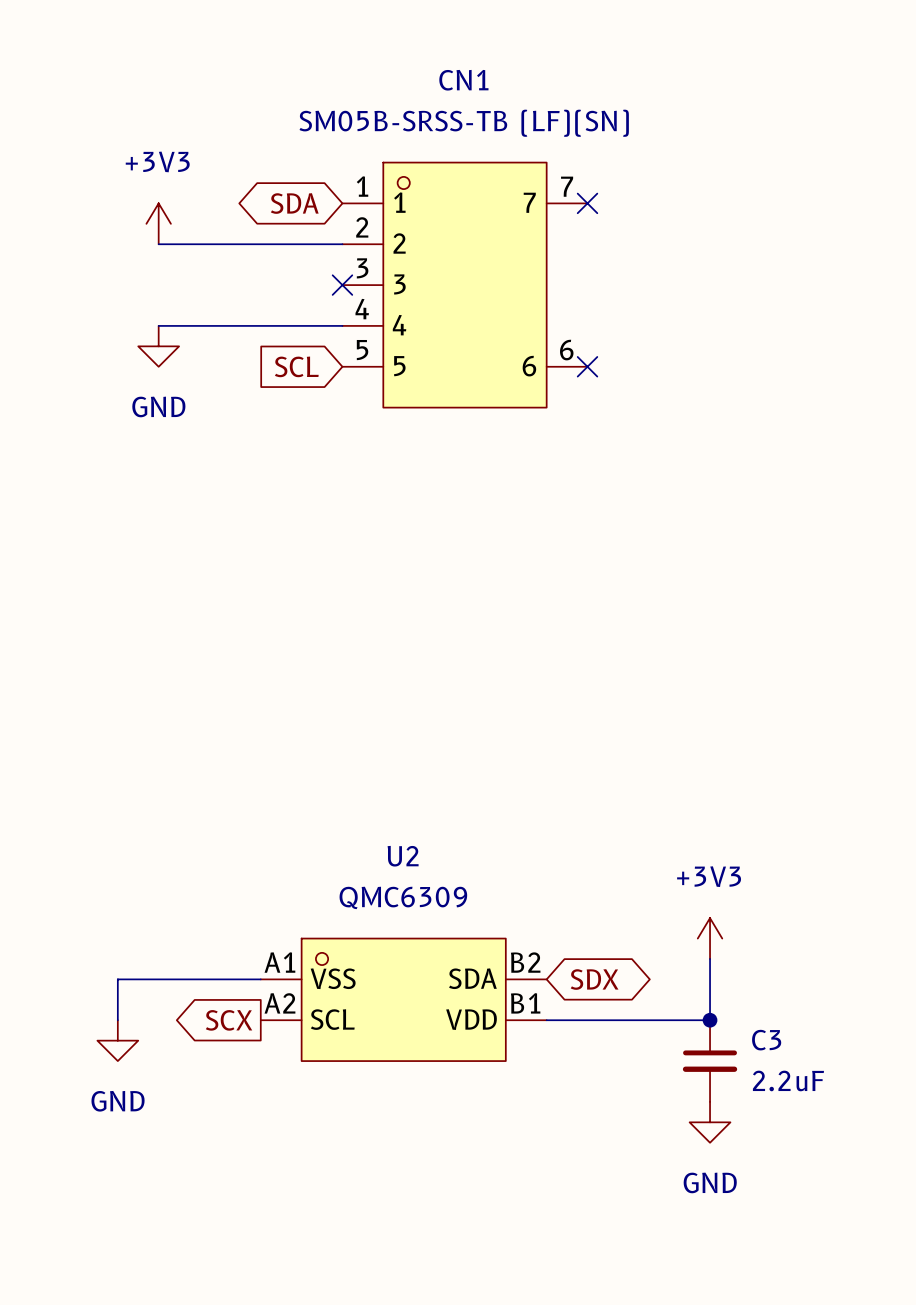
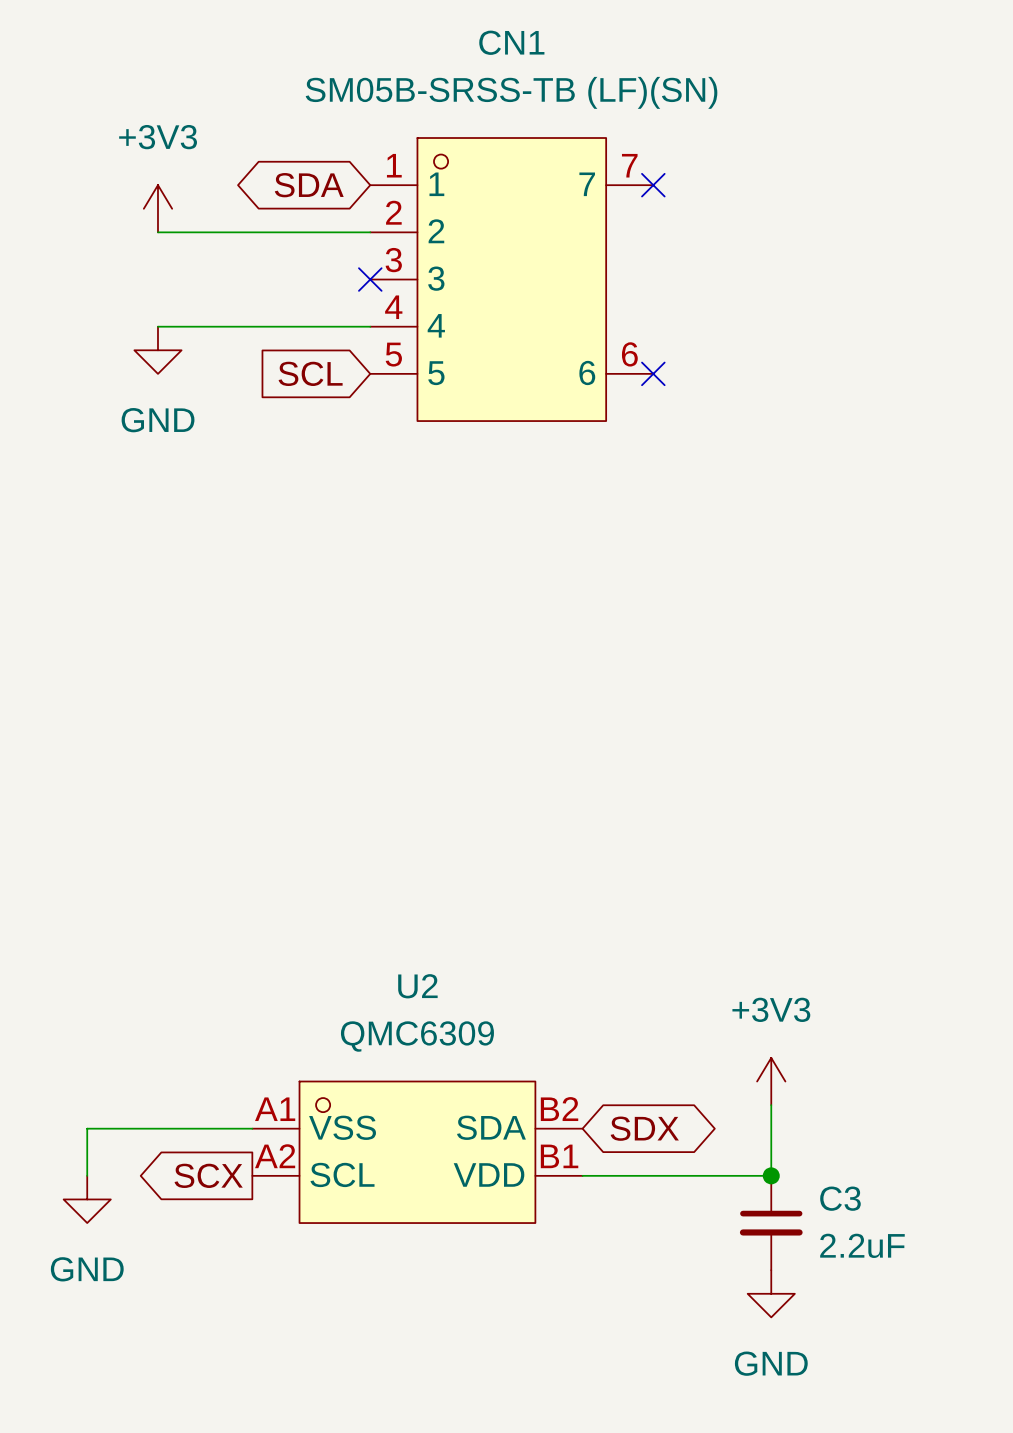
power symbol position: +3V3 (710, 938) -> +3V3 (771, 1081)
wire: (710, 958) (710, 1020) (546, 1020) -> (771, 1105) (771, 1175) (582, 1175)
wire: (260, 979) (117, 979) (117, 1020) -> (252, 1128) (87, 1128) (87, 1175)
global label position: SDX (594, 979) -> SDX (644, 1128)
U2 position: (403, 999) -> (417, 1152)
global label position: SCX (229, 1020) -> SCX (208, 1175)
junction position: (710, 1020) -> (771, 1175)
power symbol position: GND (117, 1040) -> GND (87, 1199)
C3 position: (710, 1061) -> (771, 1223)
power symbol position: GND (710, 1122) -> GND (771, 1293)

